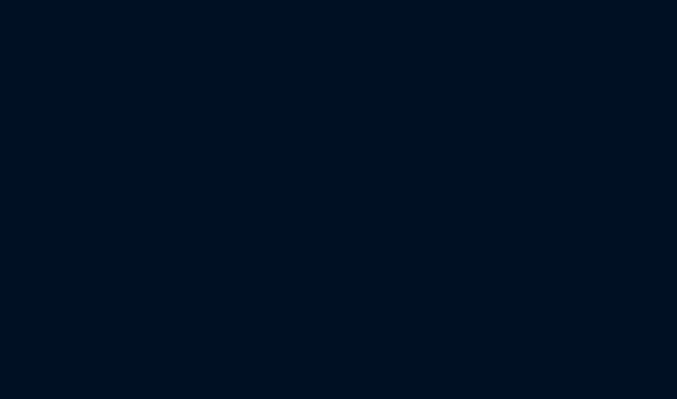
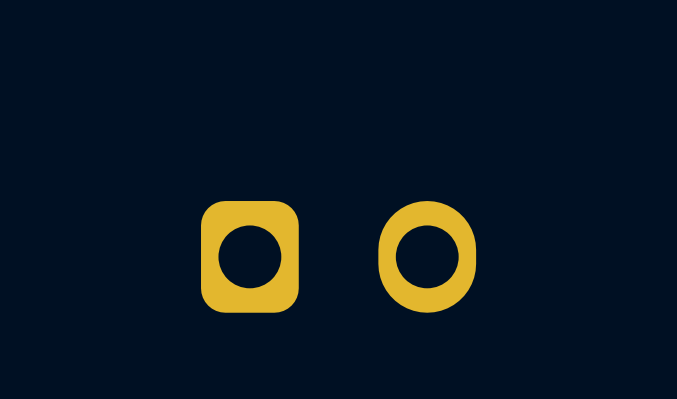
part: none -> (338, 256)

